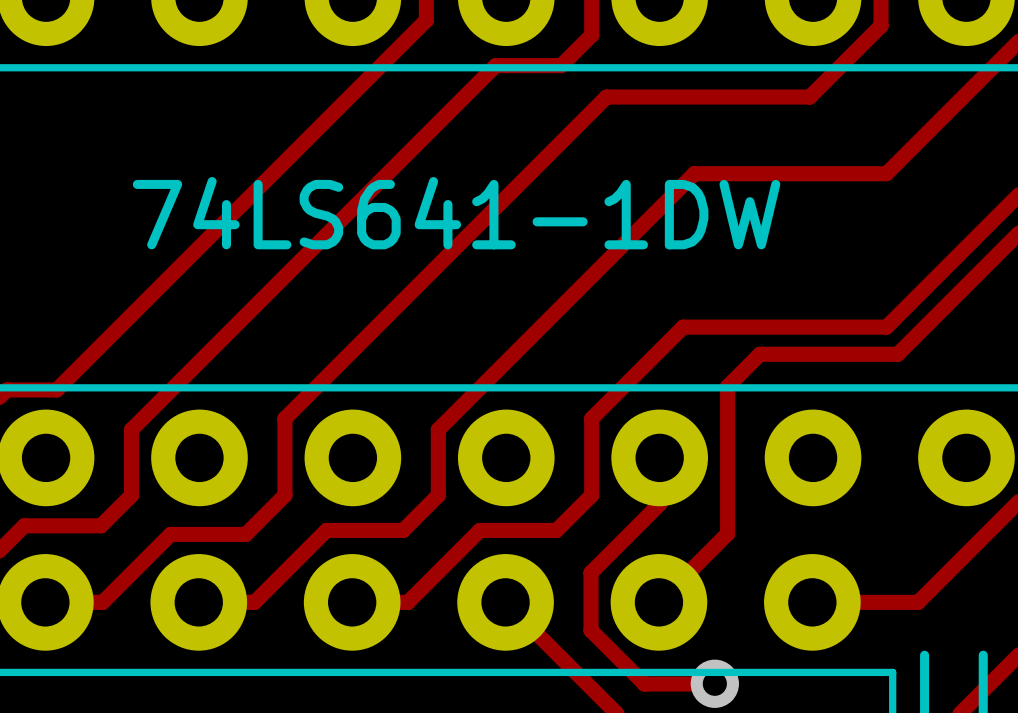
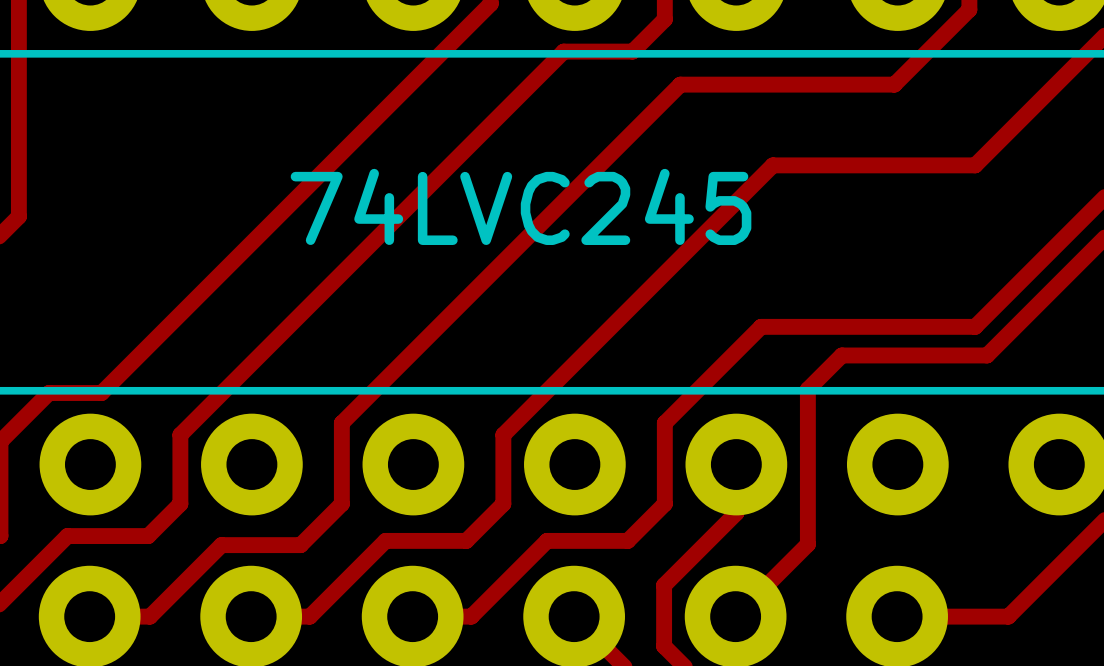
part value: 74LS641-1DW (456, 213) -> 74LVC245 (521, 206)

